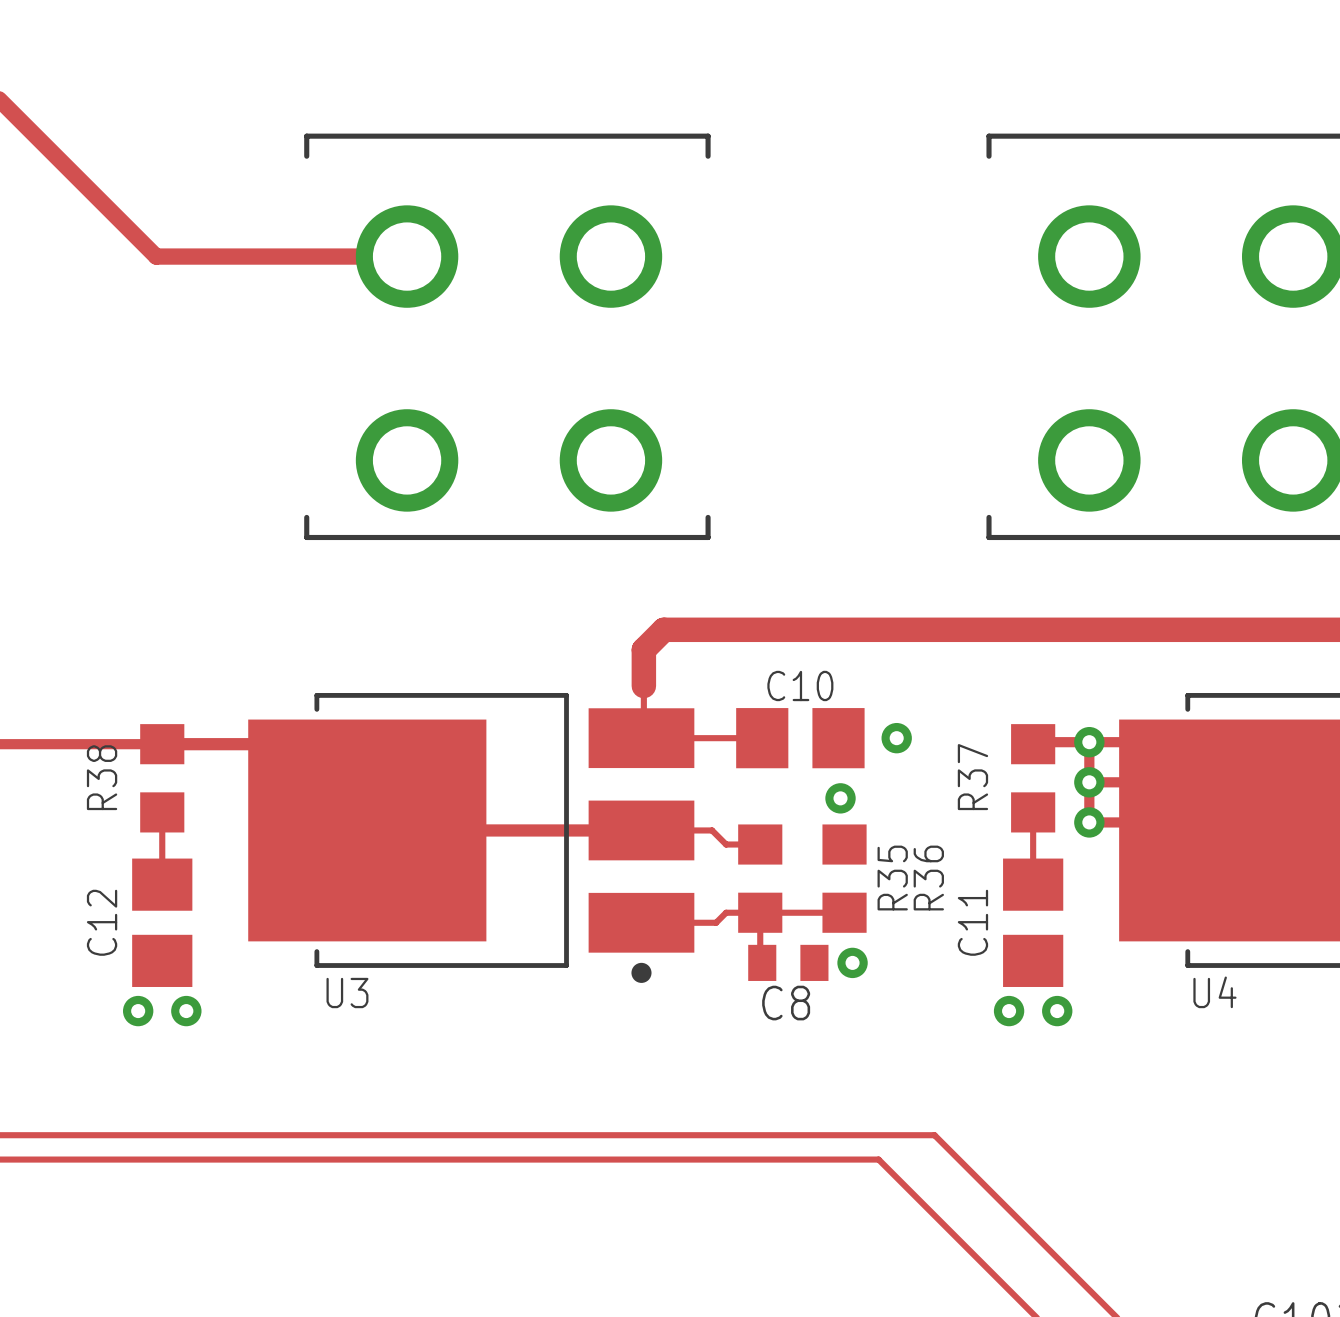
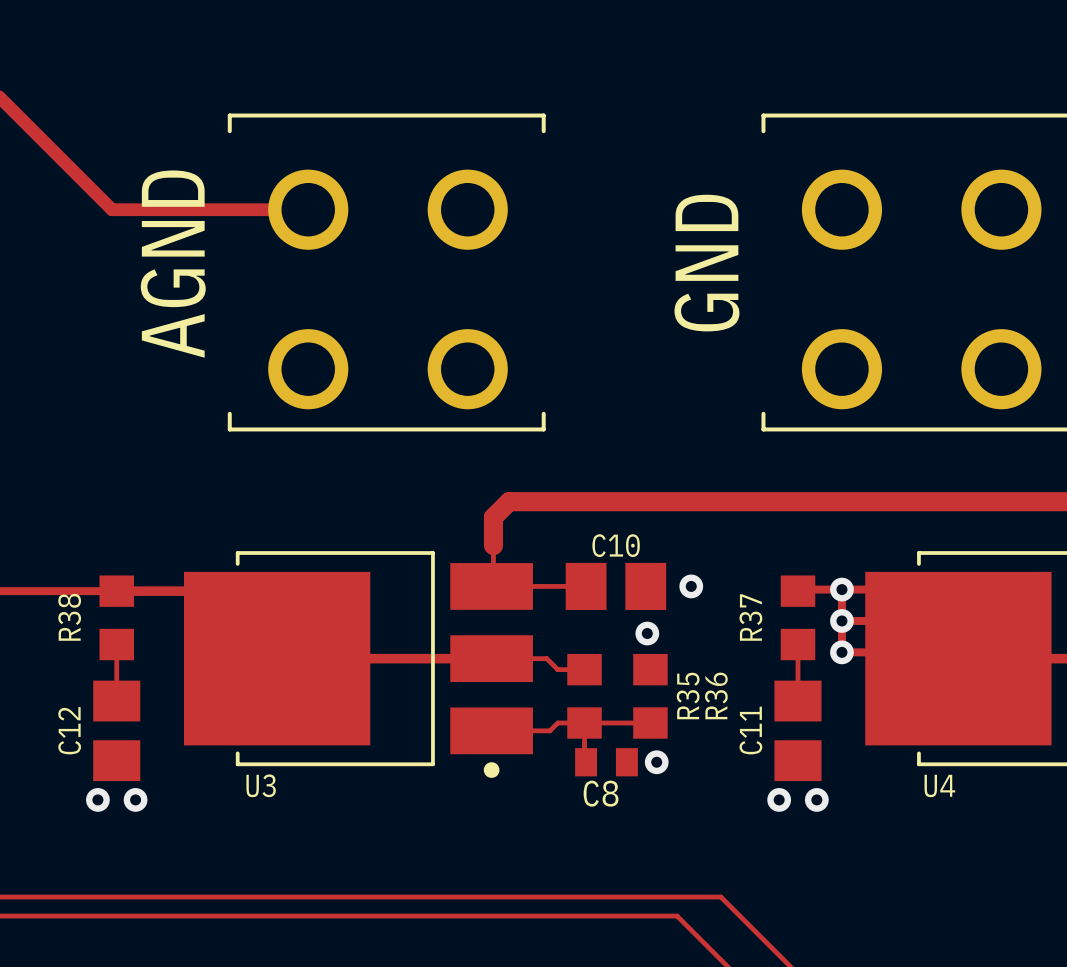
text: none -> GND (706, 263)
text: none -> AGND (173, 264)

